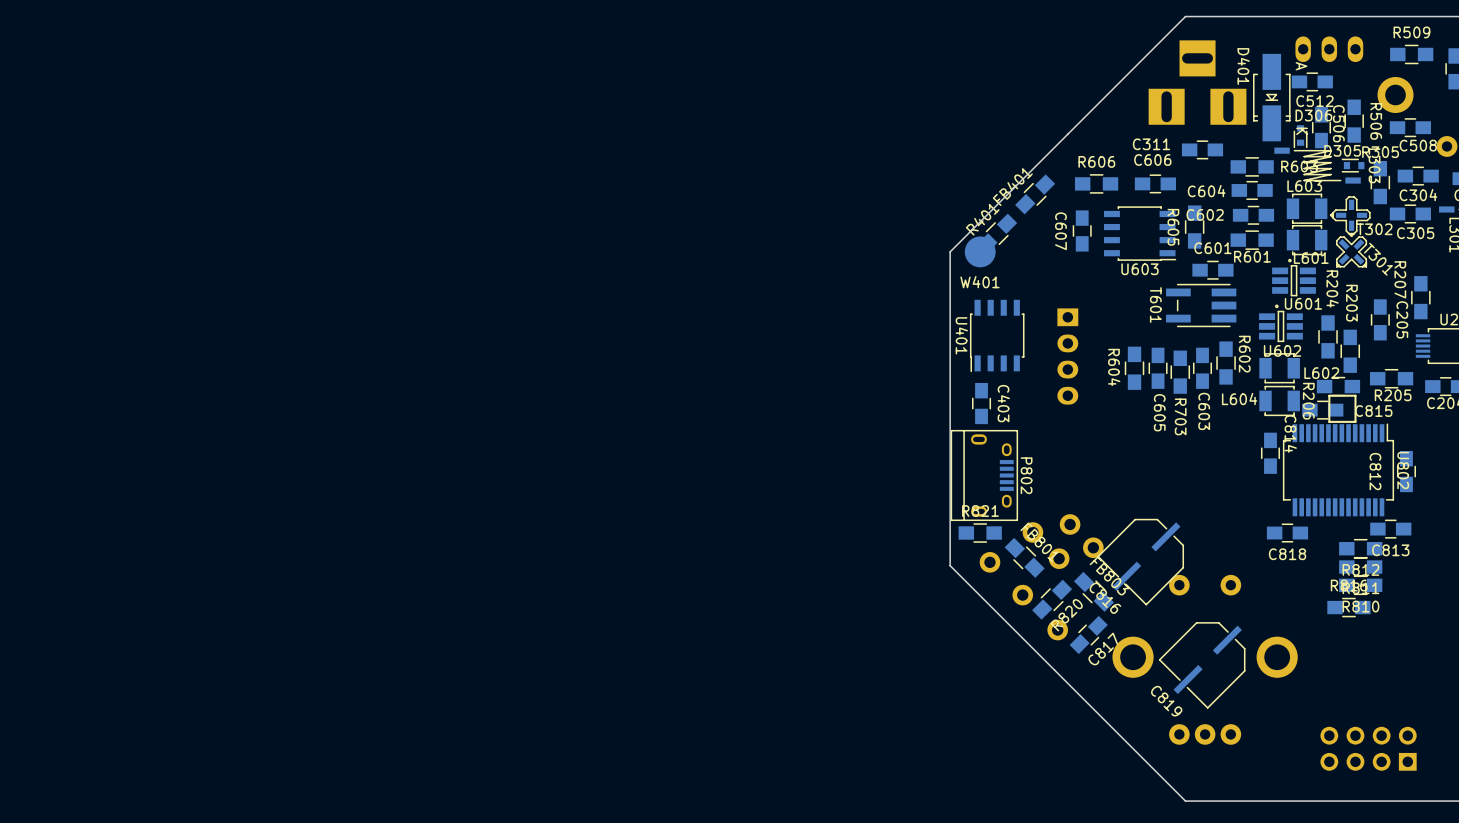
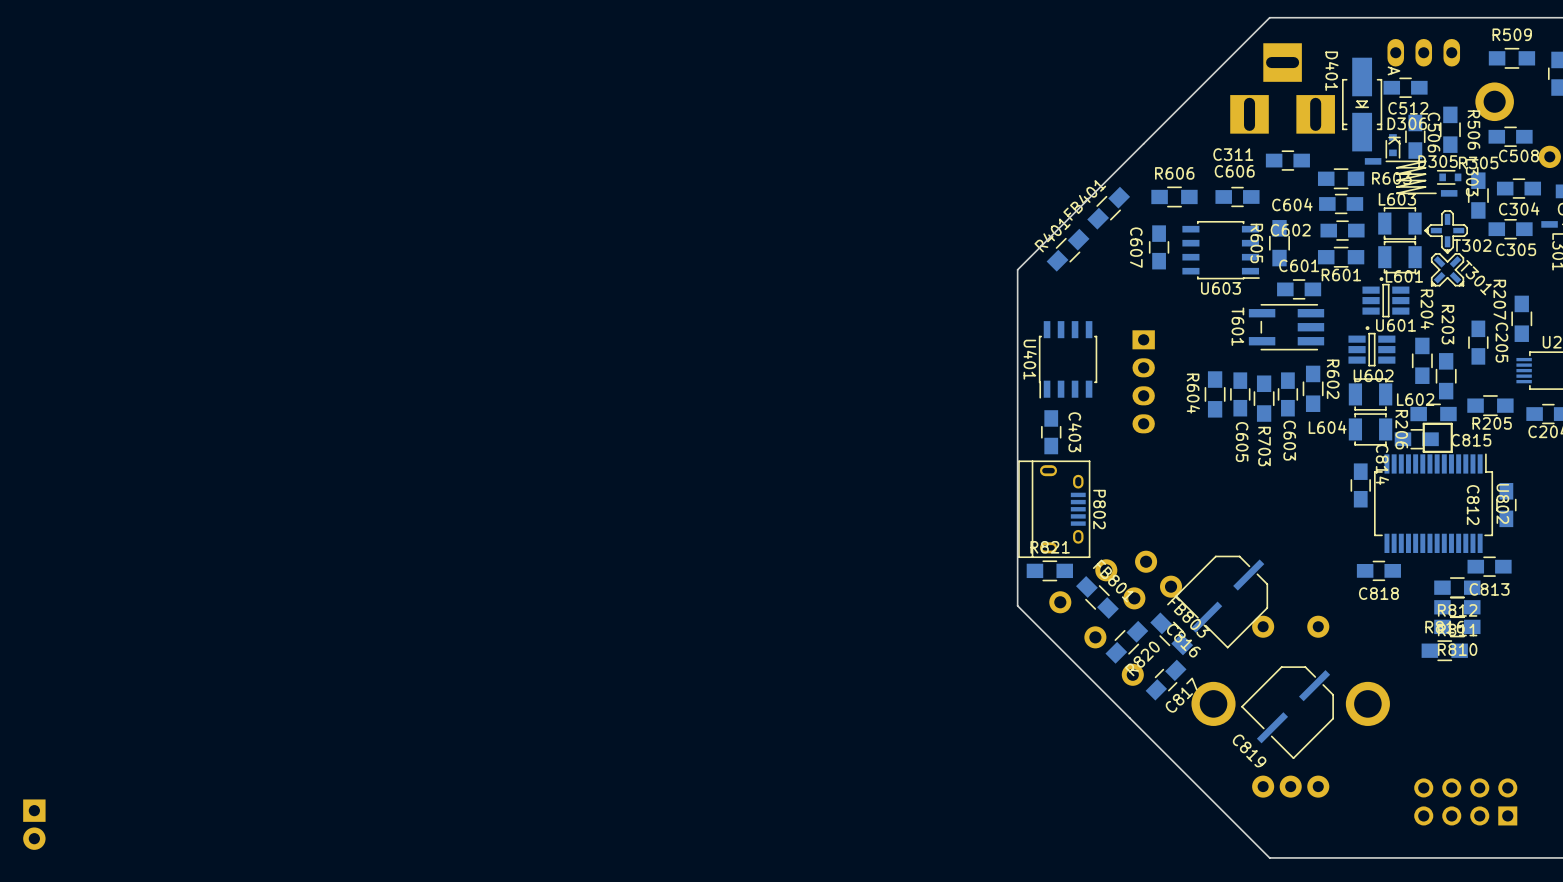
W401: (980, 251) -> none
part: none -> (34, 824)

